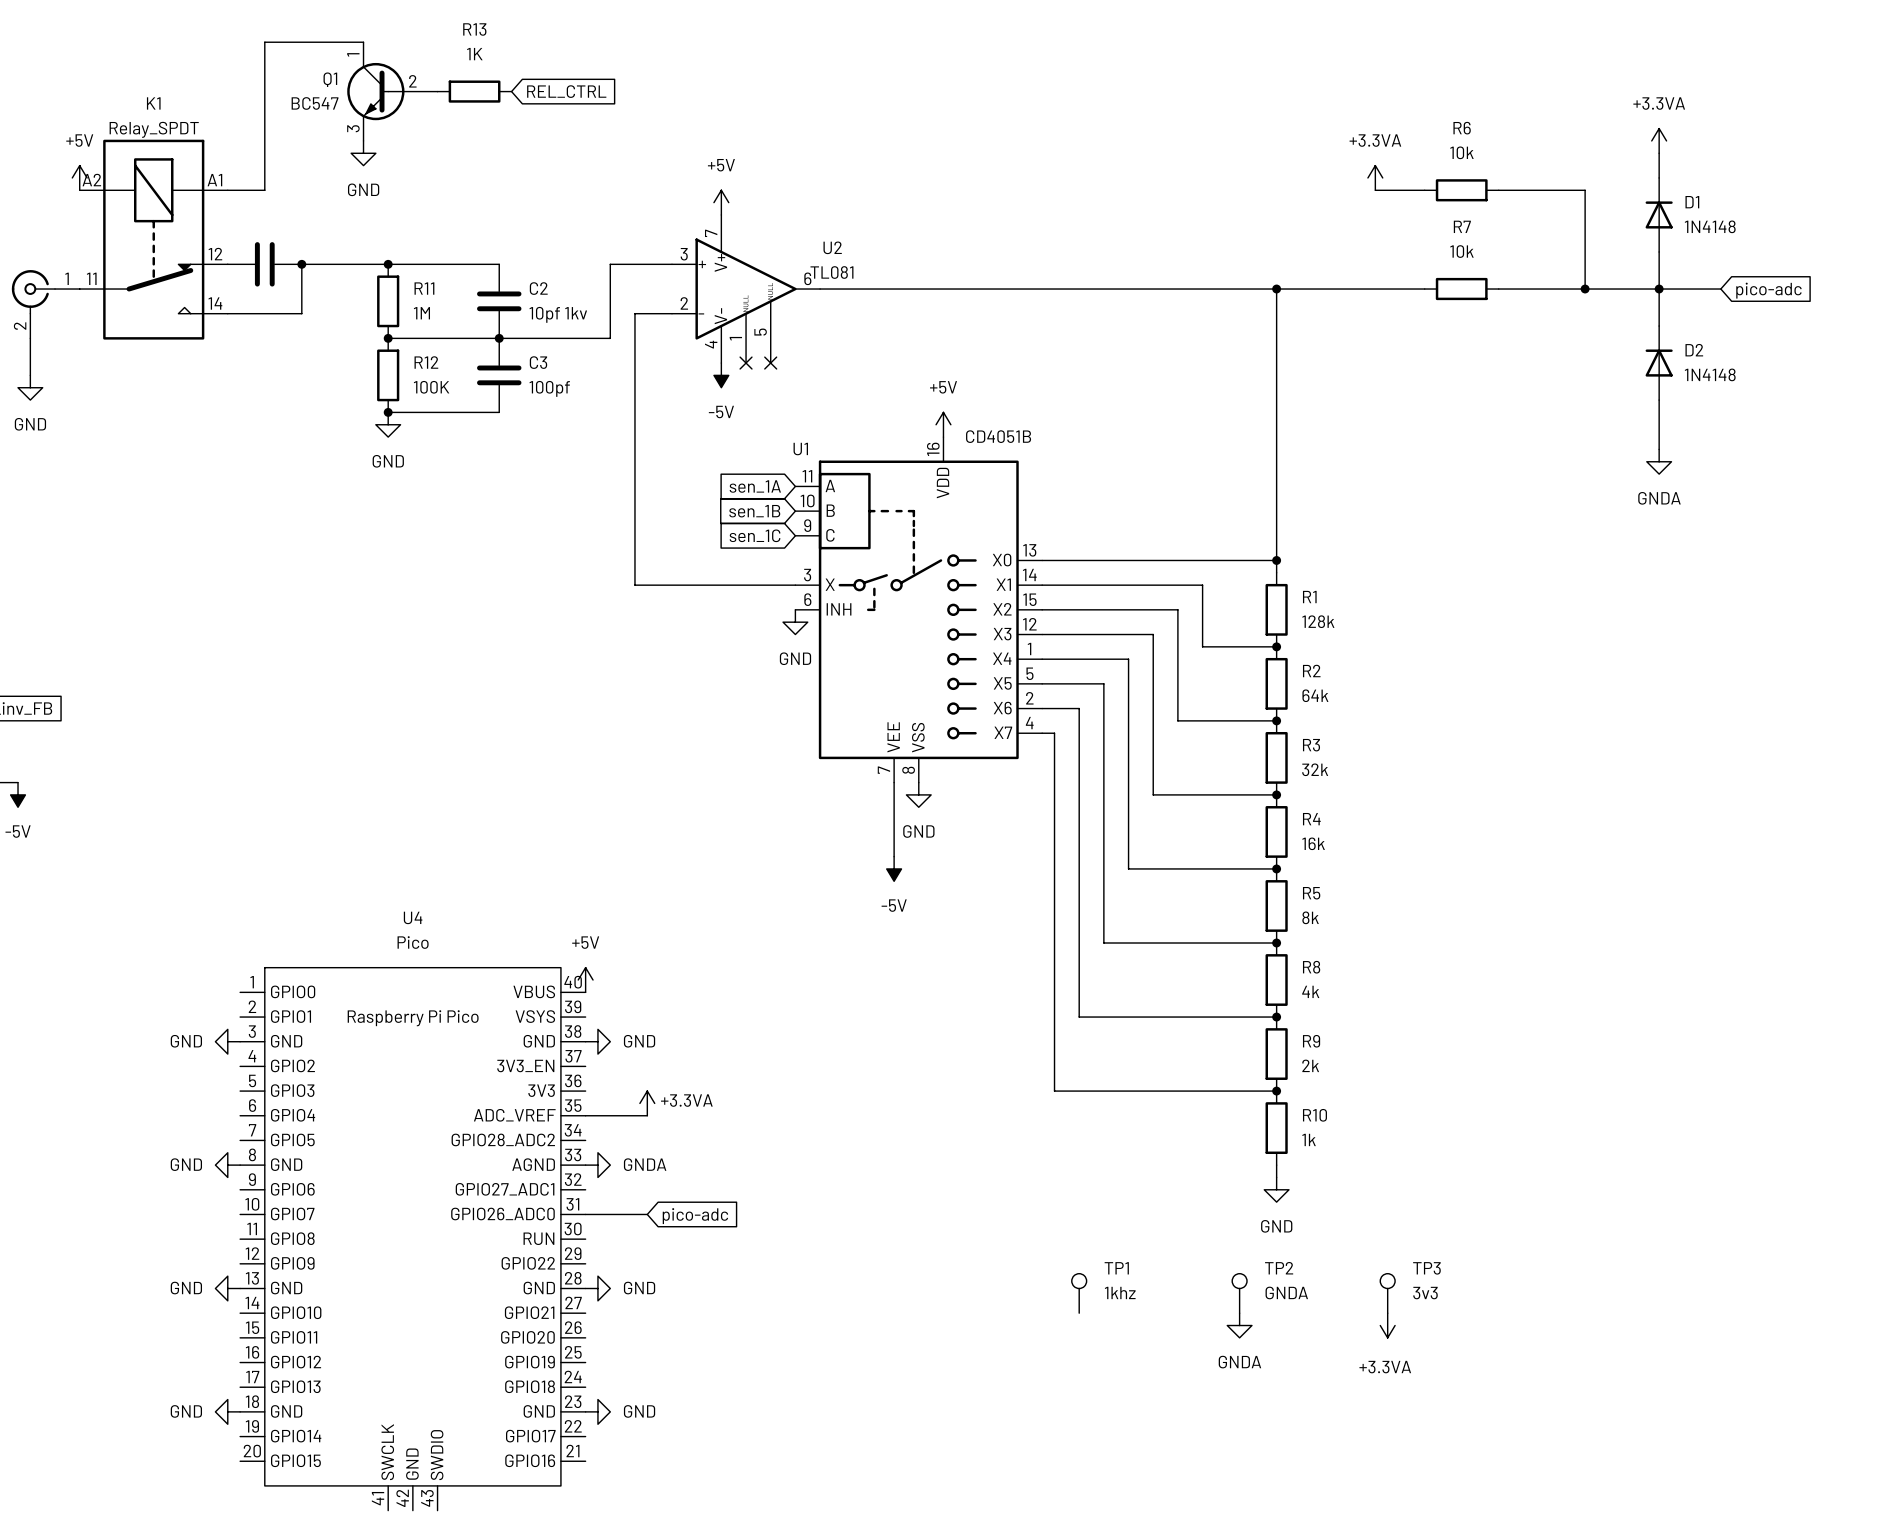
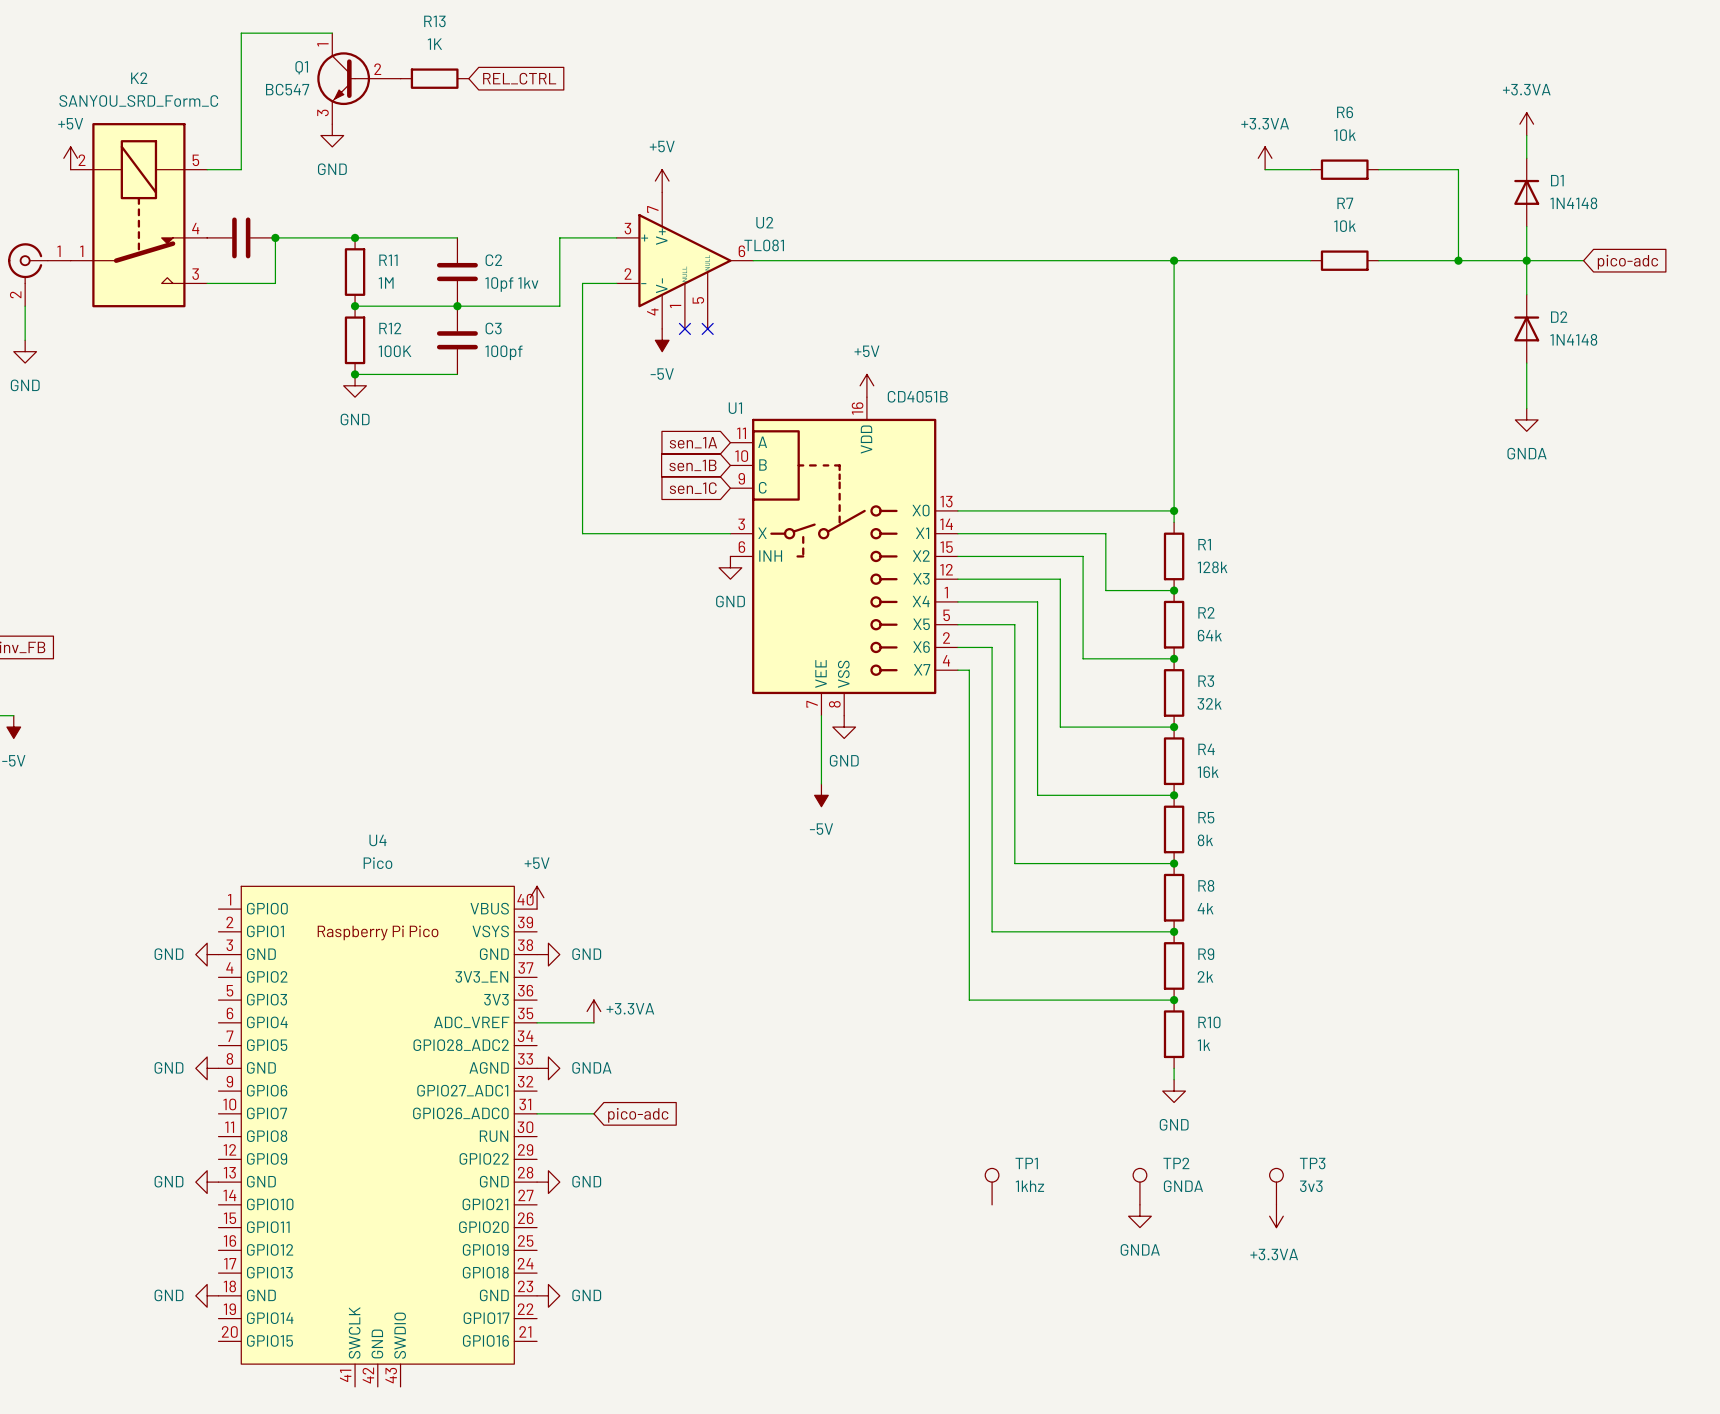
K1 name: K1 (153, 103) -> K2 (139, 78)
K1 value: Relay_SPDT (154, 129) -> SANYOU_SRD_Form_C (138, 101)
K1 pin number: A2 (91, 180) -> 2 (82, 160)
K1 pin number: A1 (214, 180) -> 5 (195, 160)
K1 pin number: 12 (215, 254) -> 4 (195, 228)
K1 pin number: 11 (91, 278) -> 1 (81, 251)
K1 pin number: 14 (215, 303) -> 3 (195, 274)

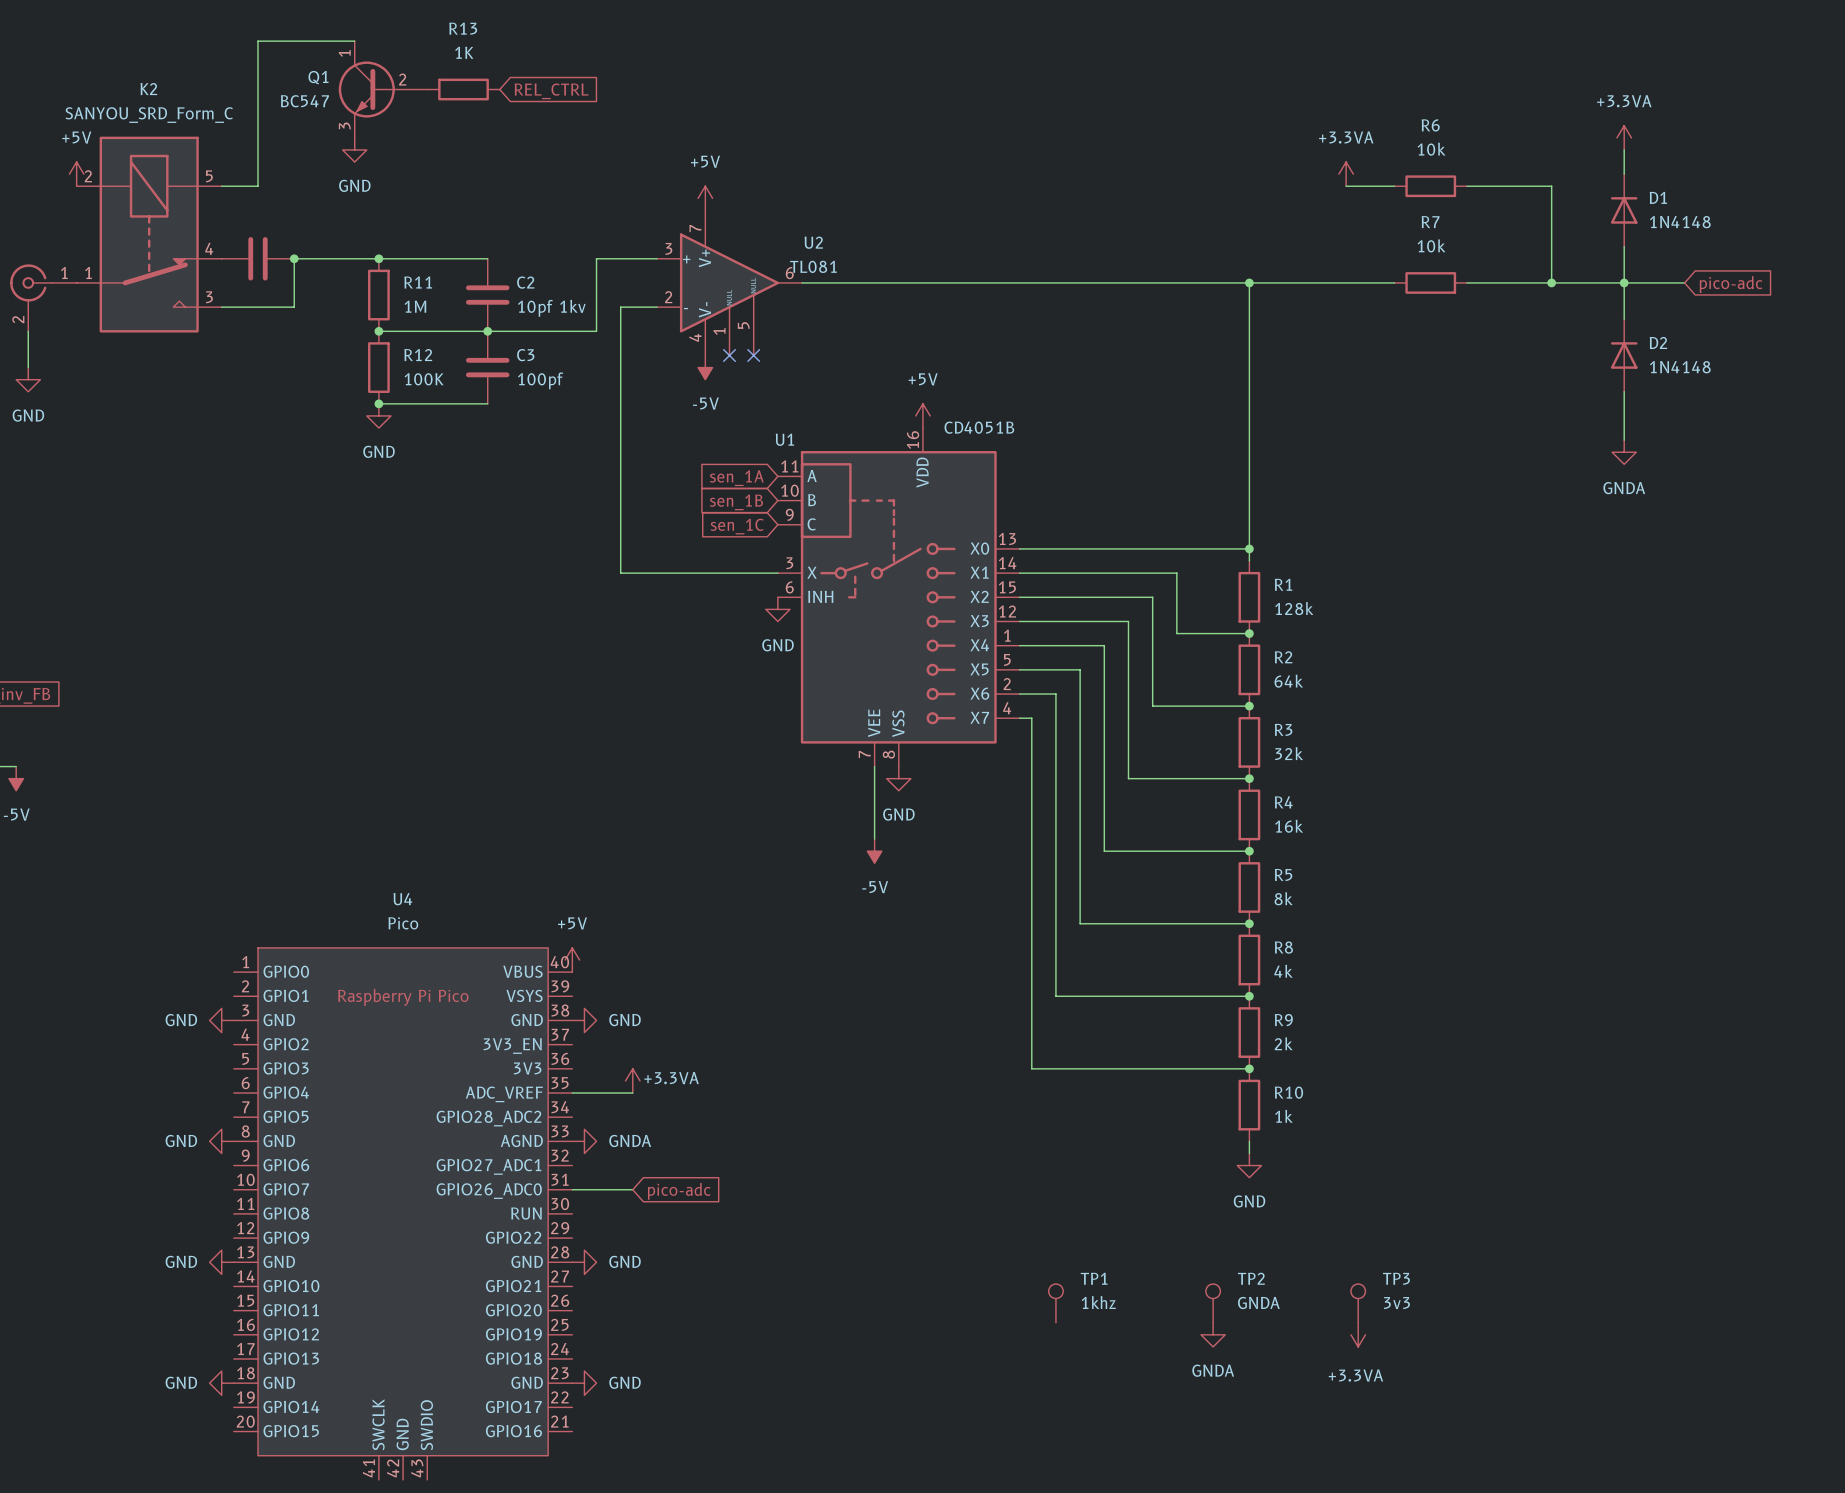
TP1 position: (992, 1186) -> (1055, 1303)
TP2 position: (1139, 1186) -> (1213, 1303)
TP3 position: (1276, 1186) -> (1358, 1303)
power symbol position: GNDA (1139, 1216) -> GNDA (1213, 1334)
power symbol position: +3.3VA (1276, 1216) -> +3.3VA (1358, 1334)

